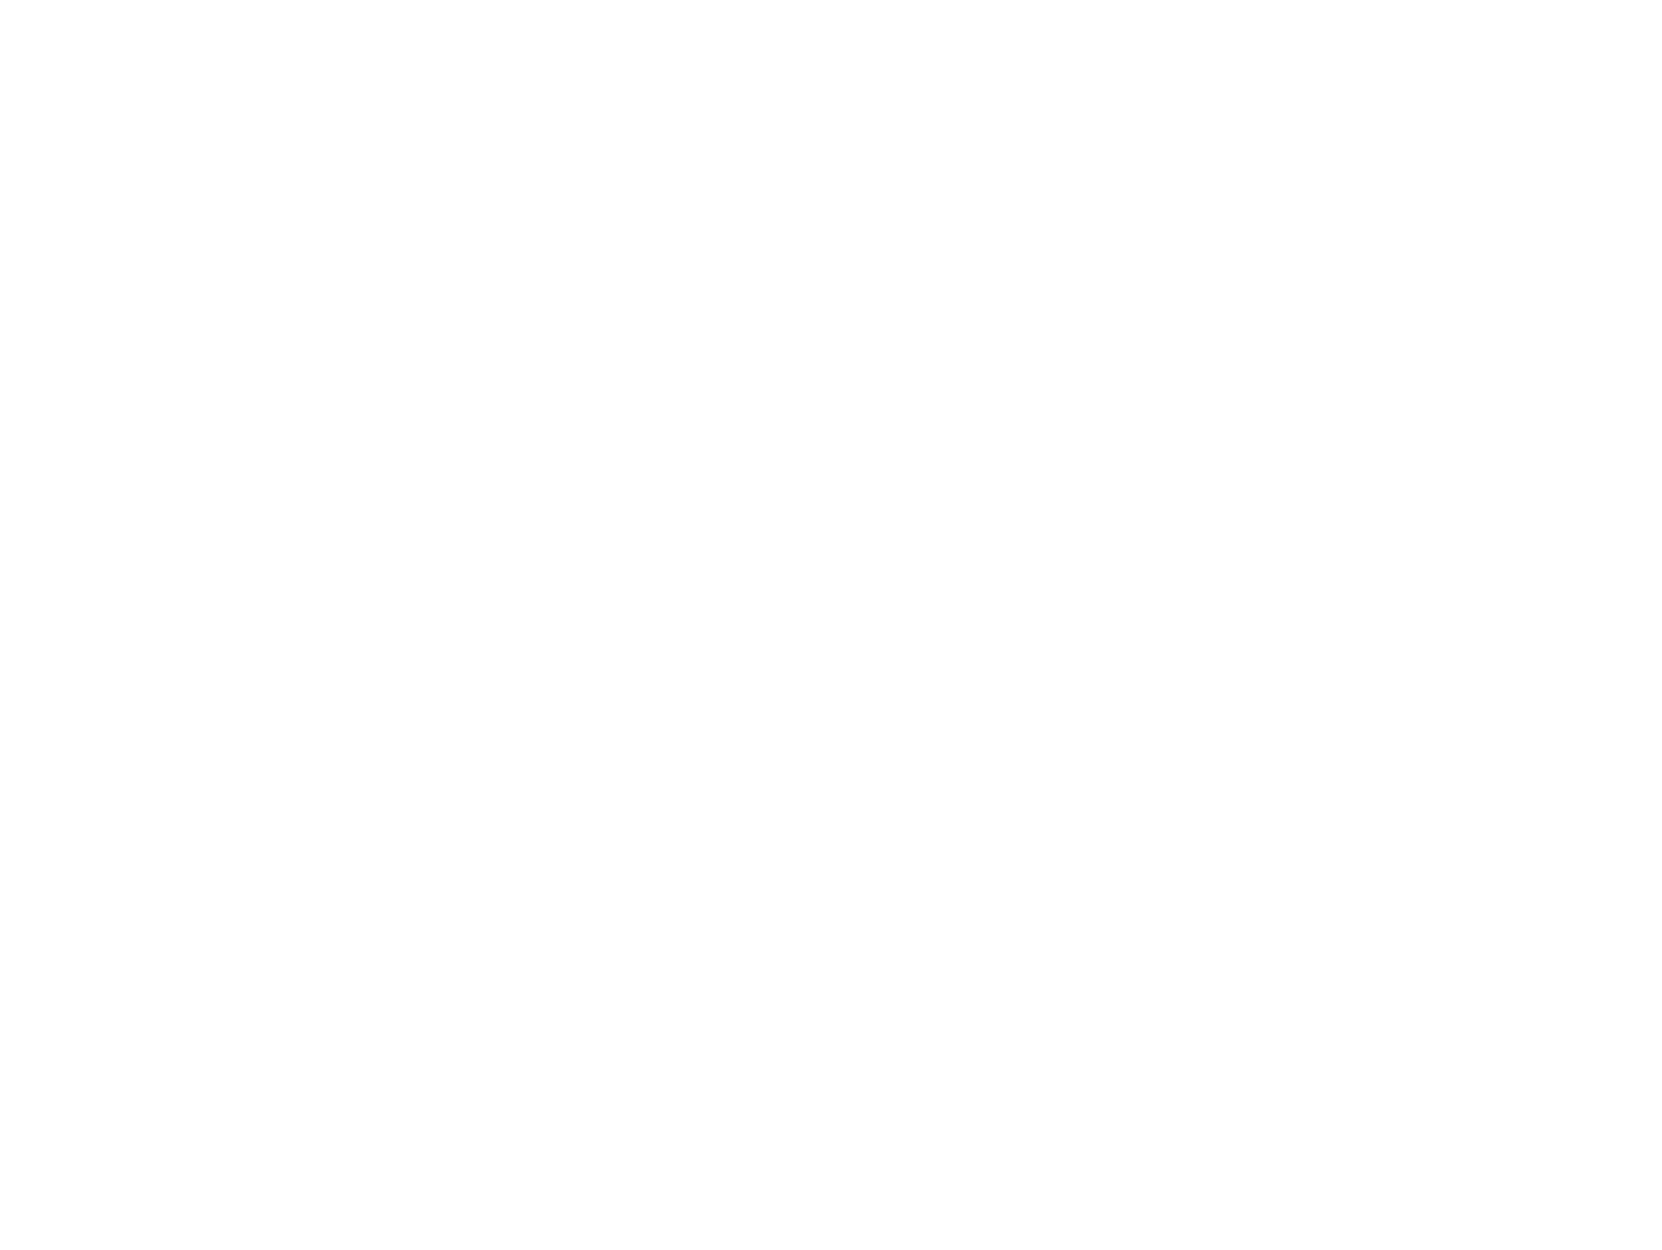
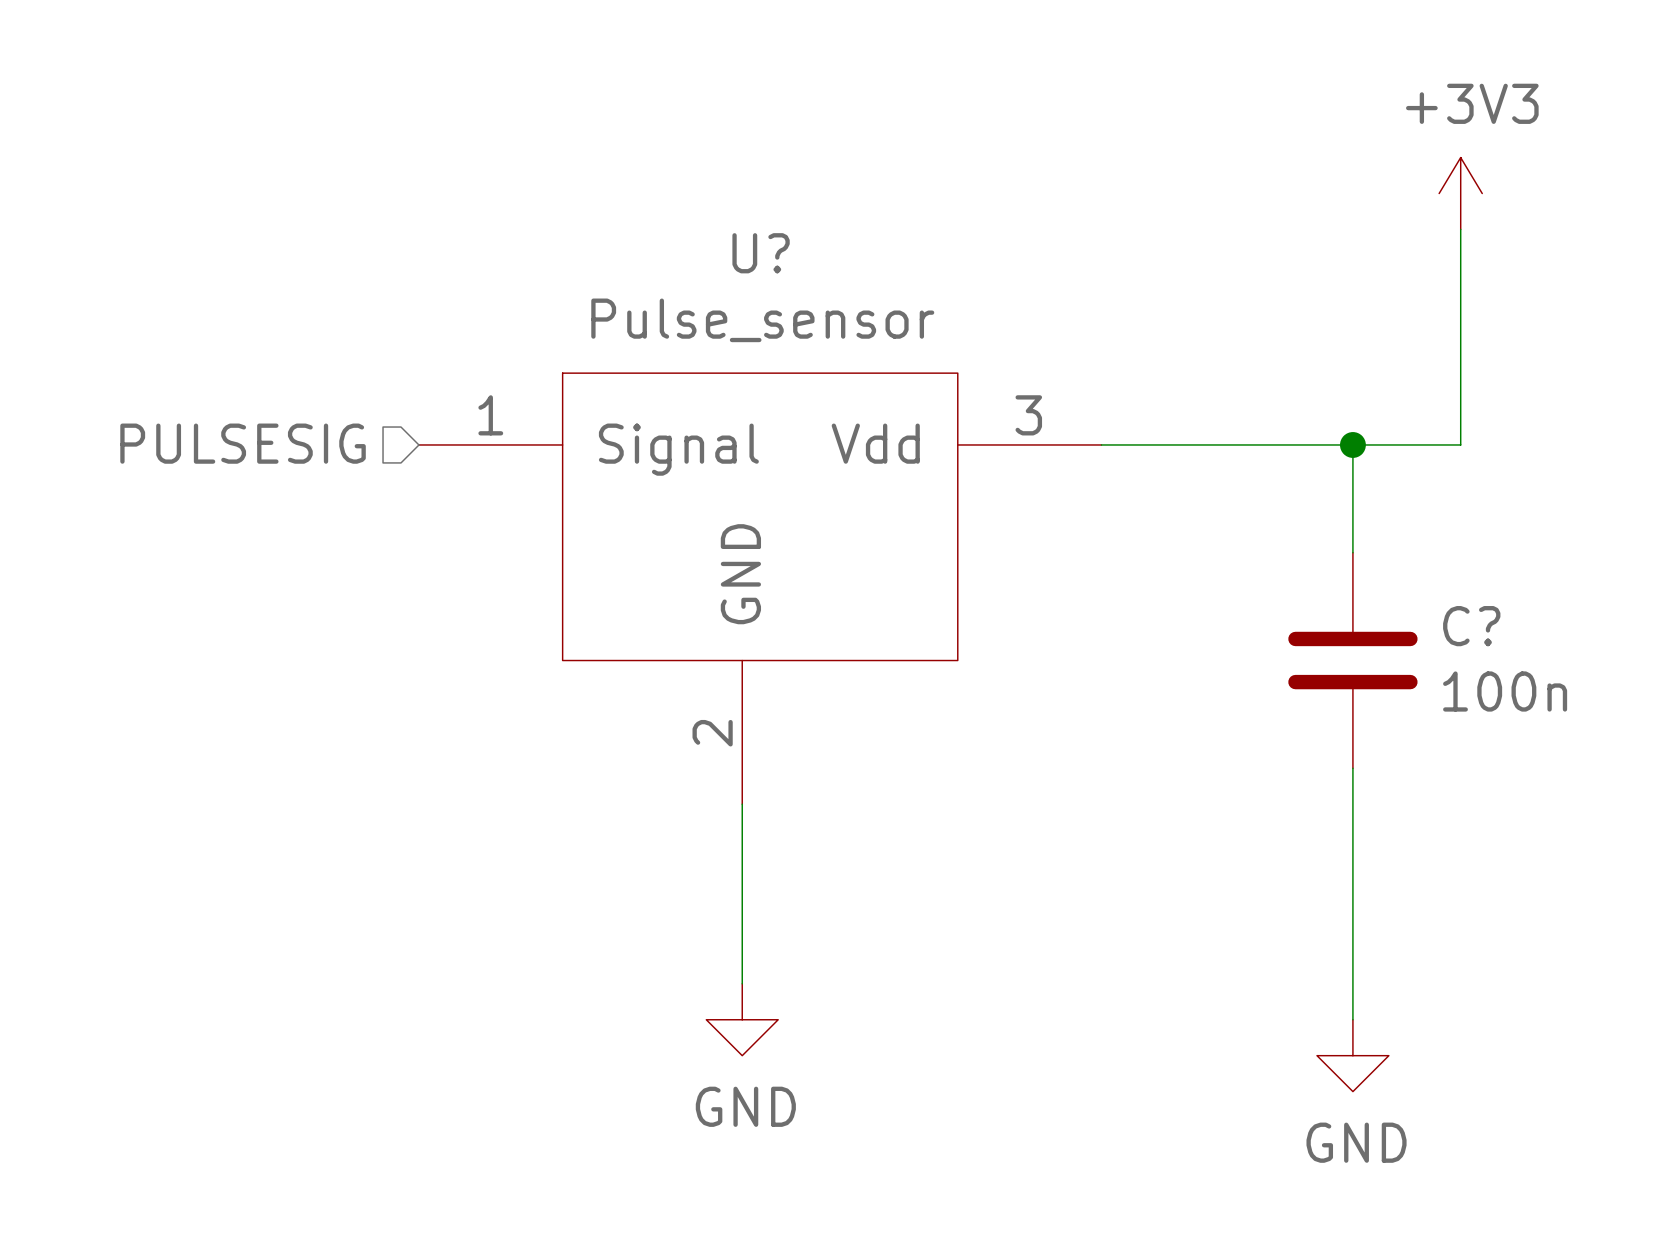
power symbol: none -> +3V3 (1460, 193)
wire: none -> (1460, 229) (1460, 444) (1101, 444)
hierarchical label: none -> PULSESIG (243, 443)
wire: none -> (1352, 444) (1352, 552)
junction: none -> (1352, 444)
U?: none -> Pulse_sensor (760, 588)
C?: none -> 100n (1352, 660)
wire: none -> (1352, 768) (1352, 1019)
wire: none -> (742, 804) (742, 983)
power symbol: none -> GND (742, 1019)
power symbol: none -> GND (1352, 1055)

